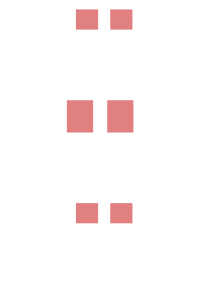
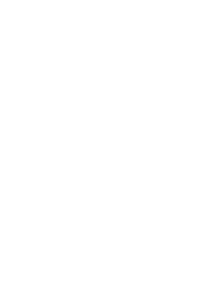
part: (104, 19) -> none
part: (100, 116) -> none
part: (104, 213) -> none

